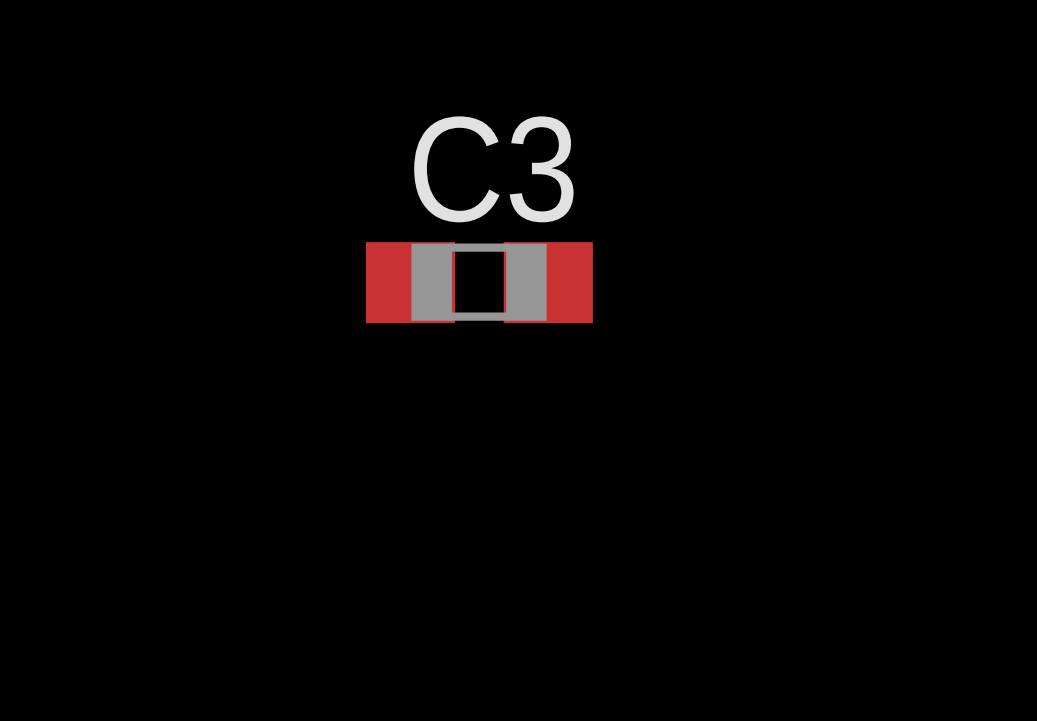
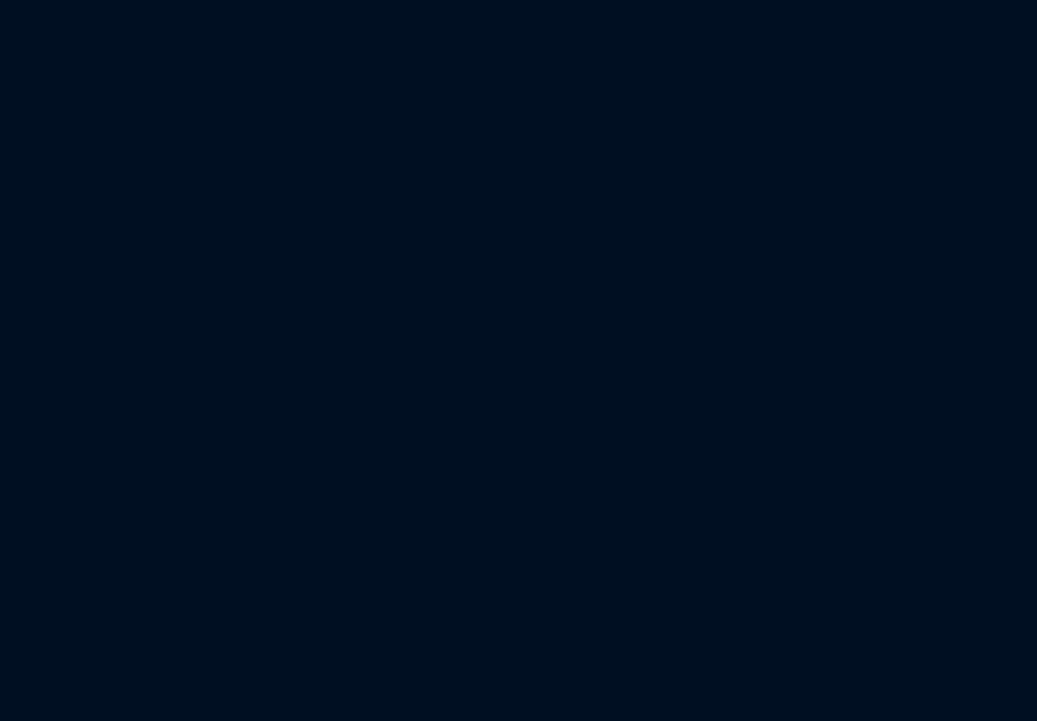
C3: (479, 282) -> none

